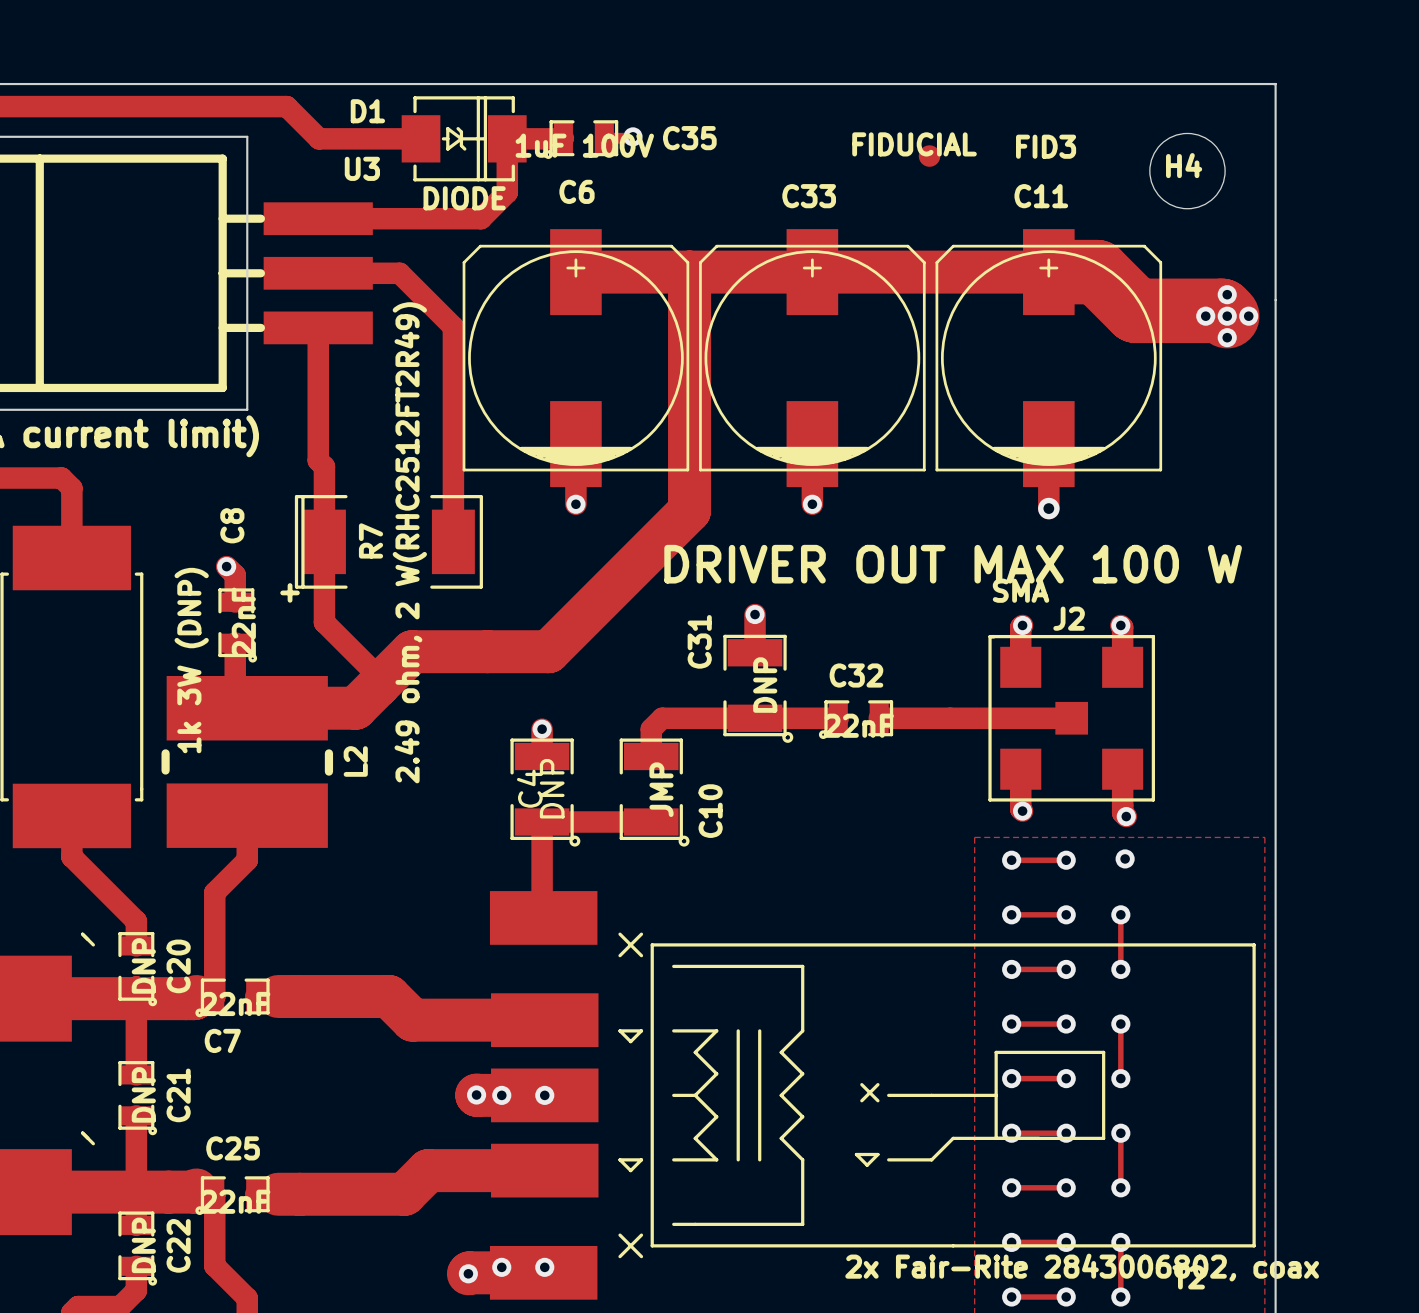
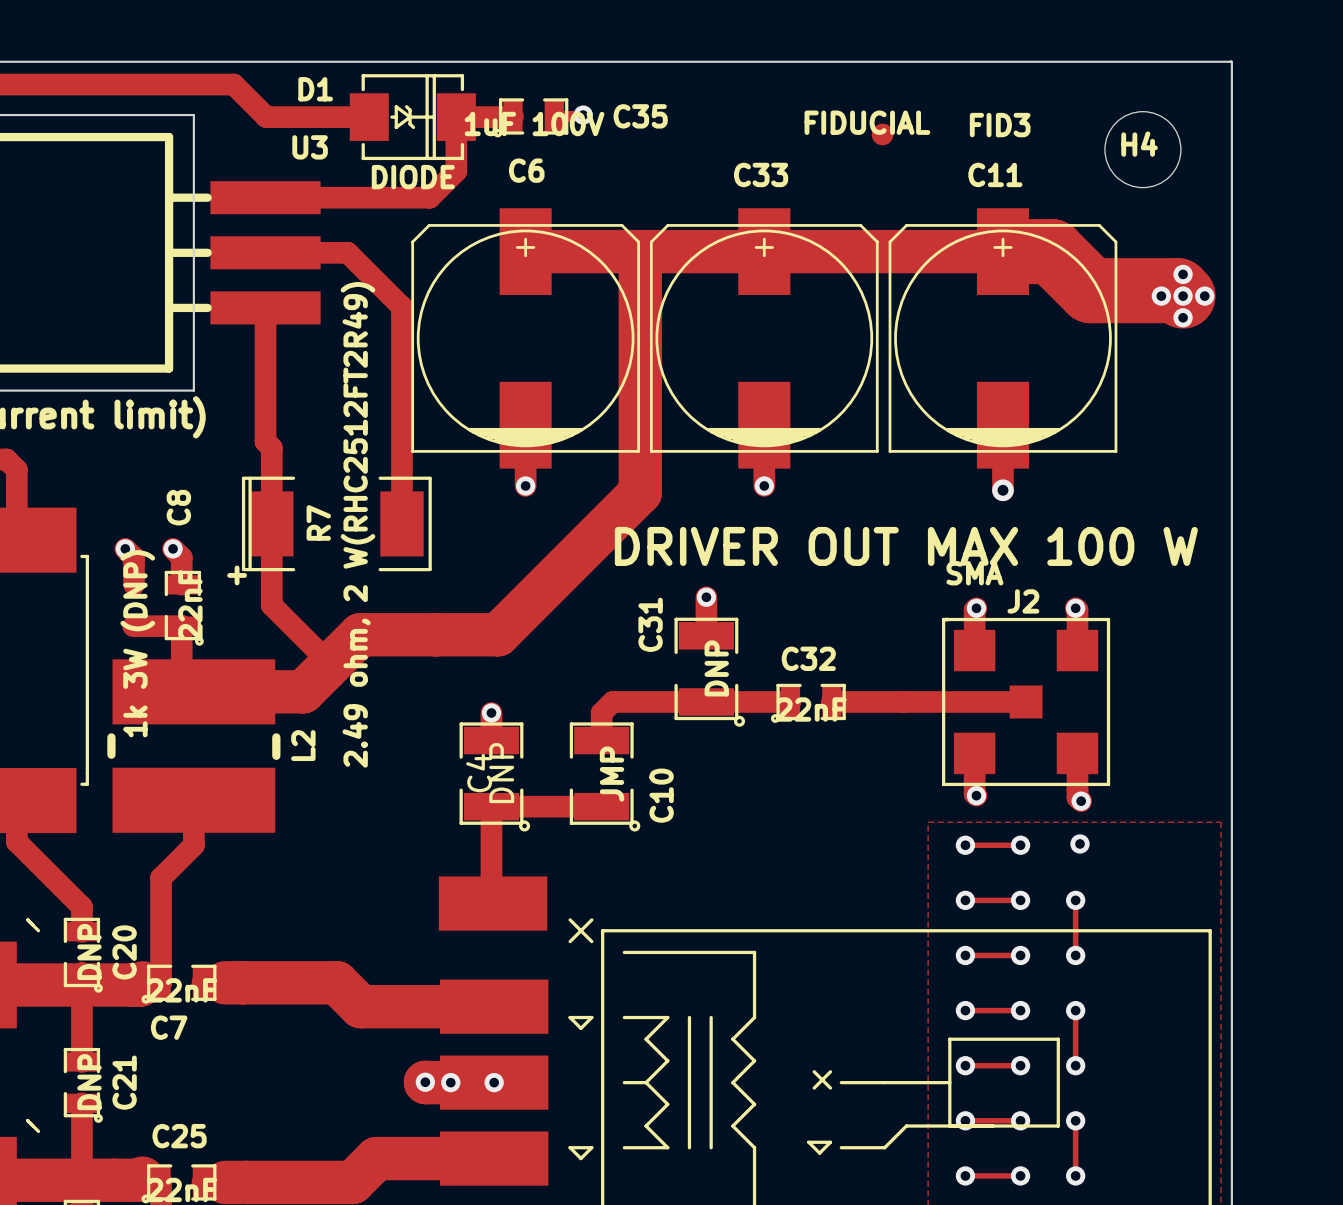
track: none -> (125, 548) (134, 557) (134, 584)
via: none -> (125, 548)
track: none -> (133, 626) (182, 626)

